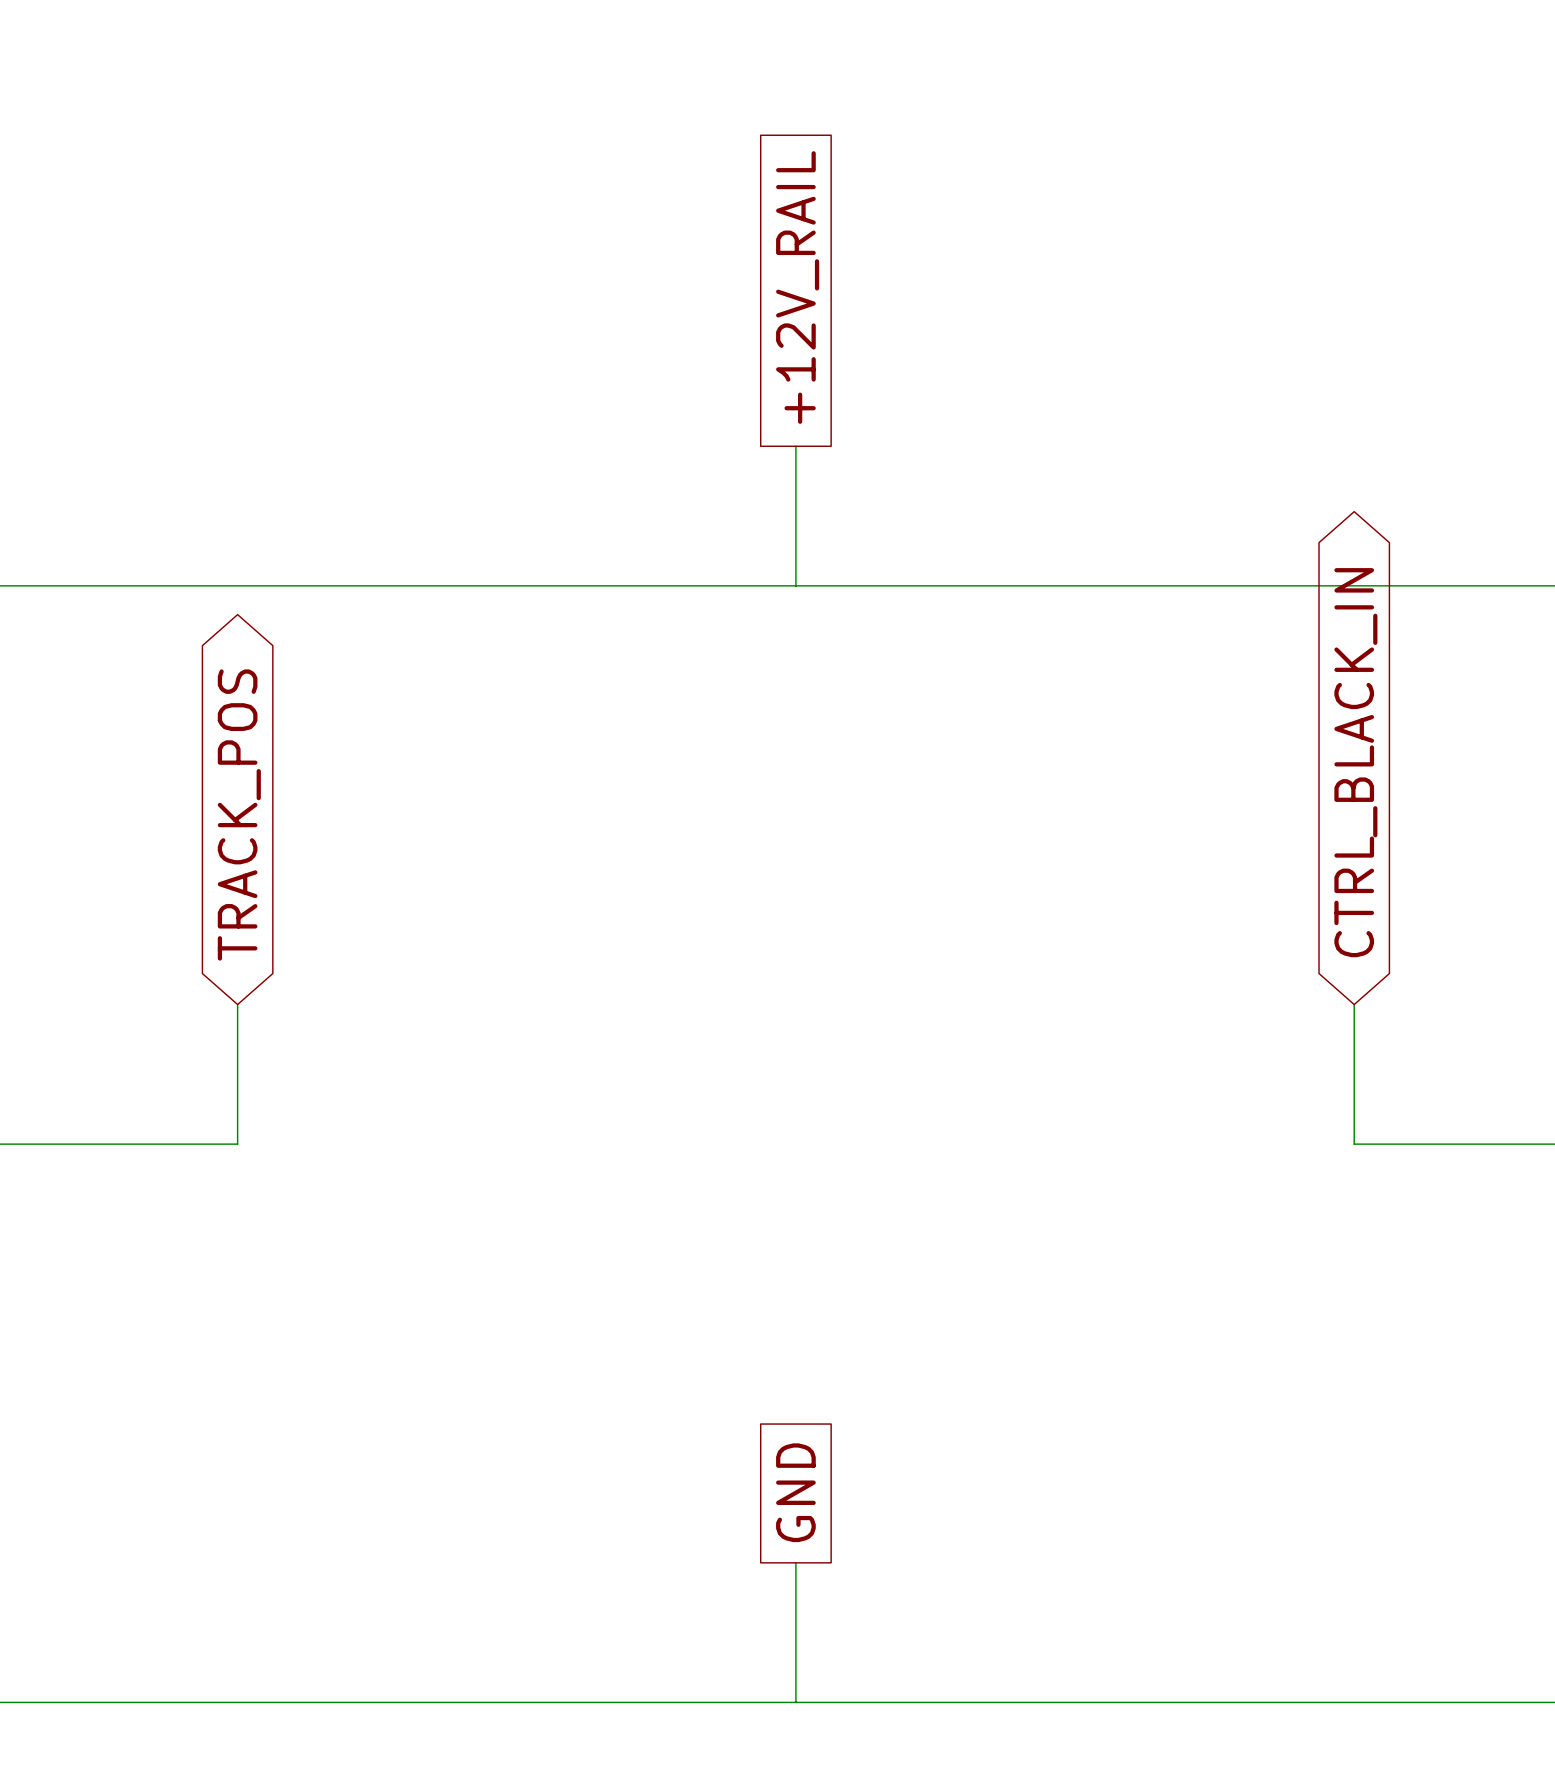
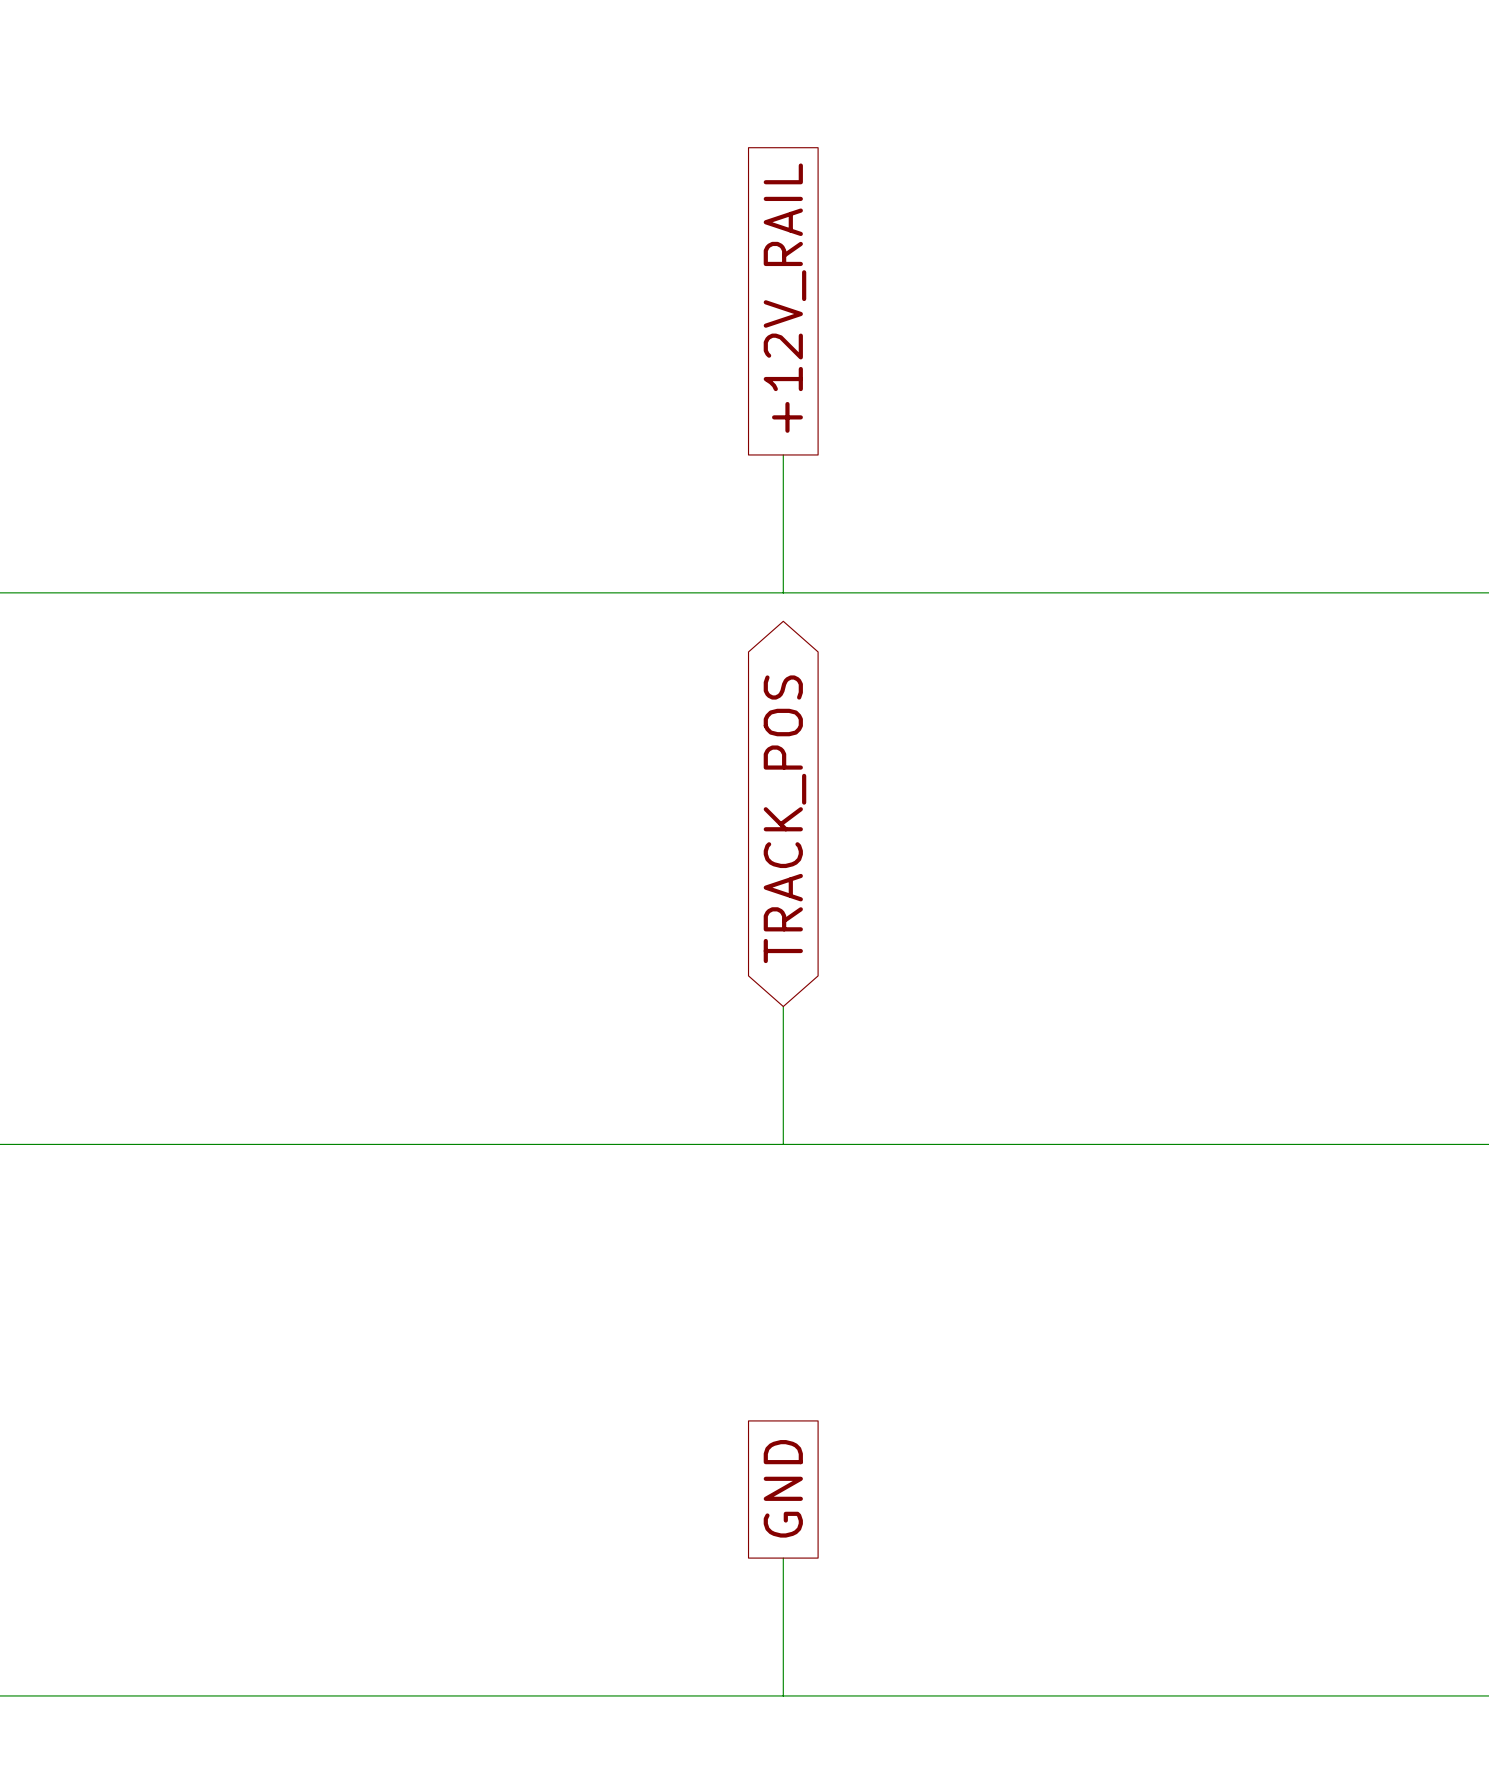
global label: CTRL_BLACK_IN (1355, 762) -> none
global label position: TRACK_POS (239, 815) -> TRACK_POS (784, 819)
wire: (237, 1004) (237, 1144) -> (1334, 1144) (231, 1144)
wire: (1354, 1004) (1354, 1144) -> (783, 1006) (783, 1144)

